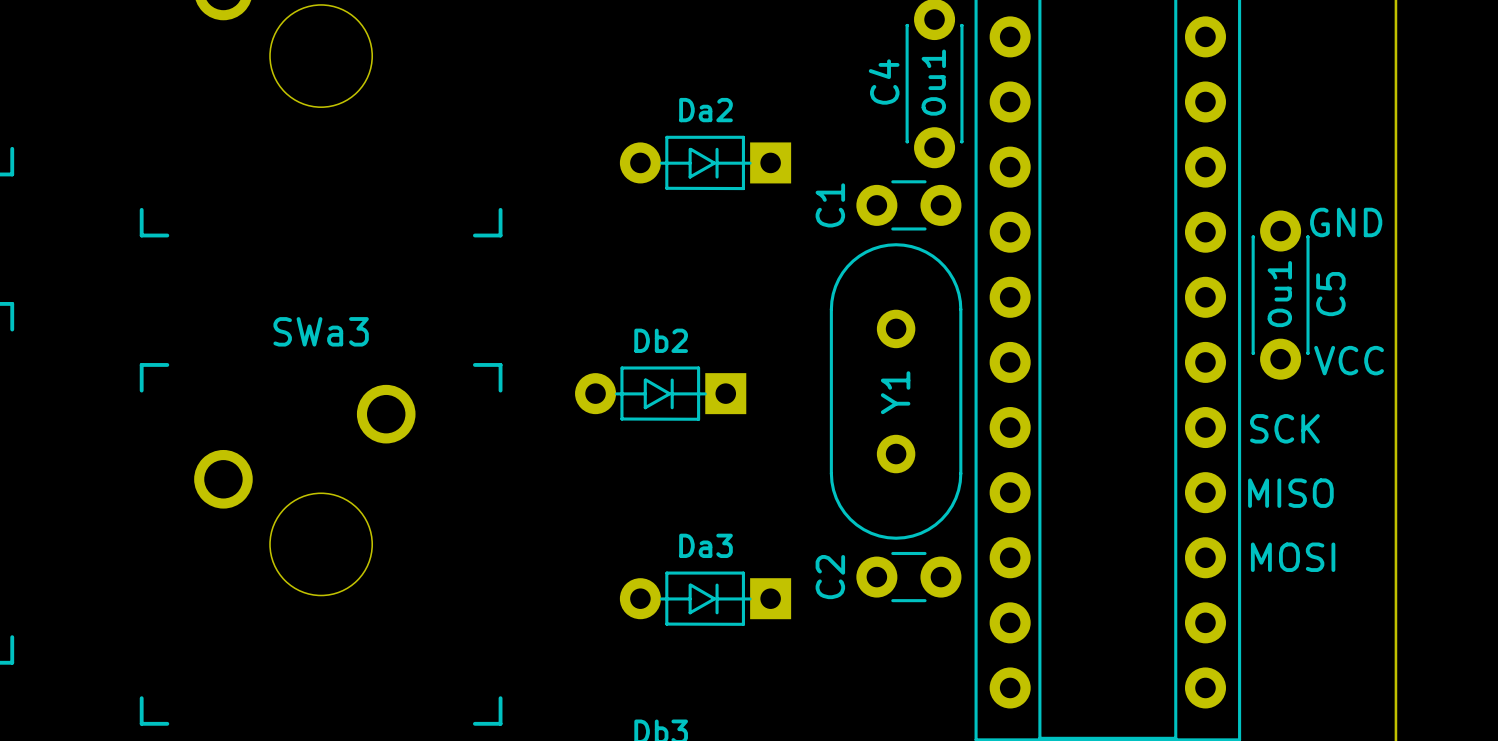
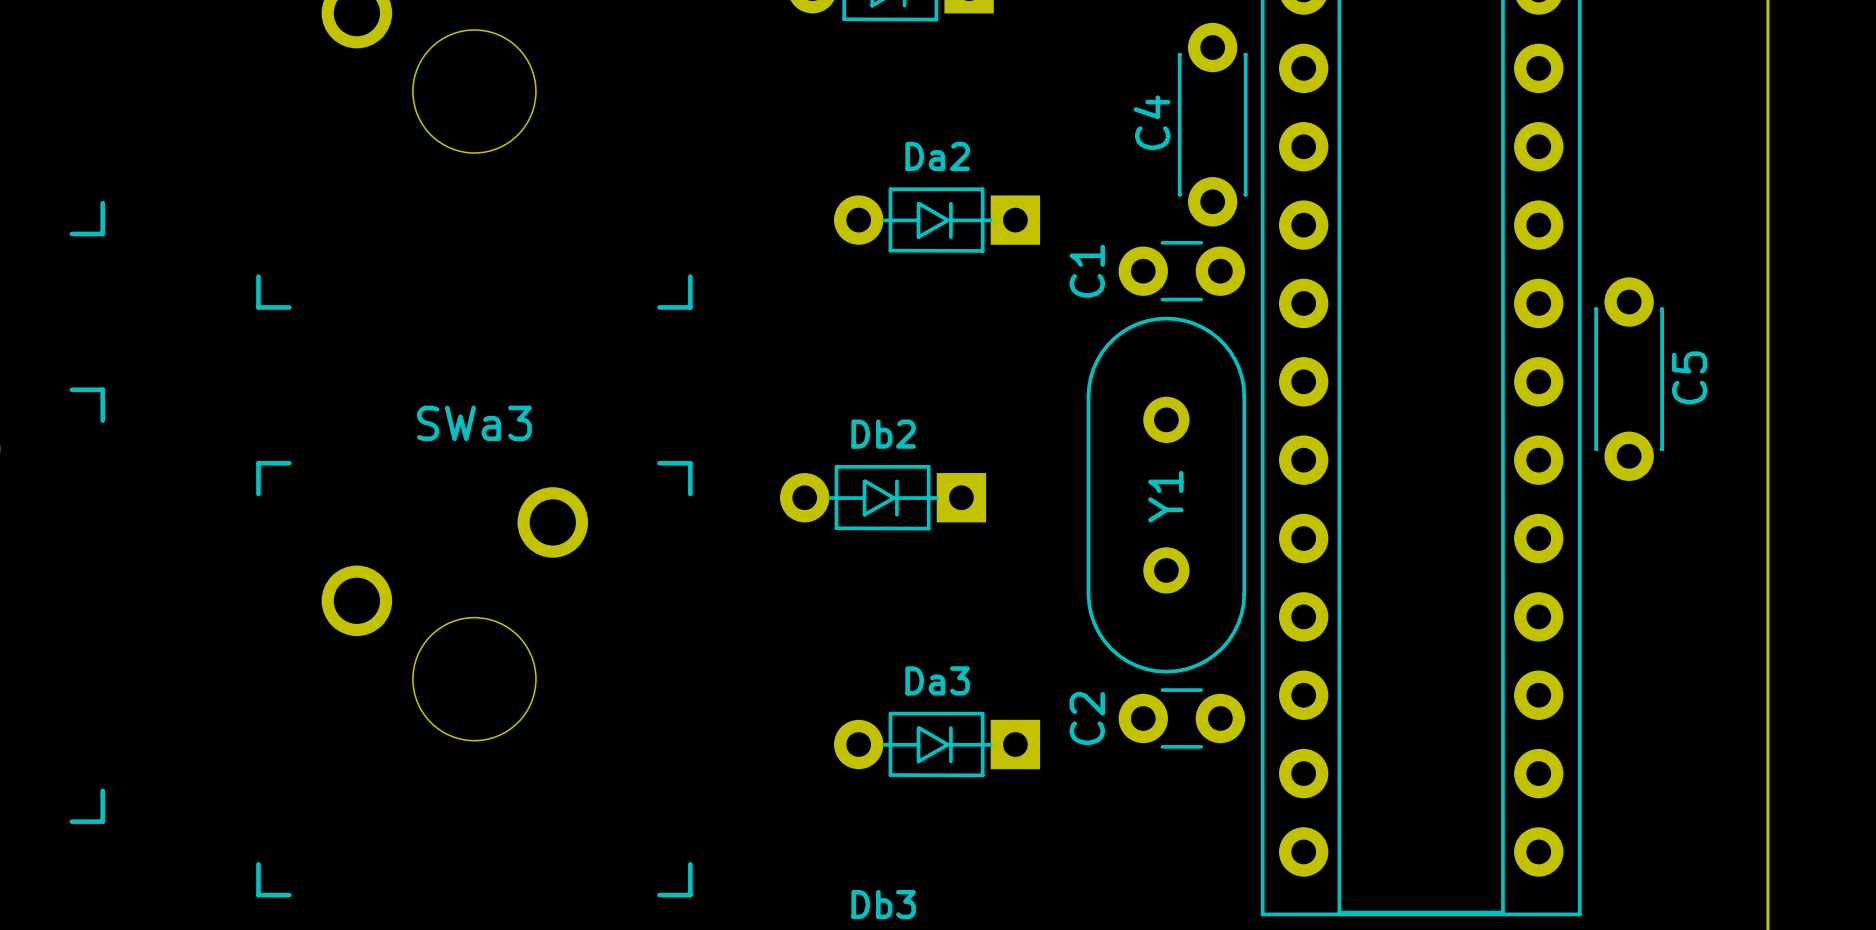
C4 value: 0u1 (933, 82) -> none
text: GND (1346, 222) -> none
C5 value: 0u1 (1279, 294) -> none
text: VCC (1349, 360) -> none
text: SCK (1284, 428) -> none
text: MISO (1290, 493) -> none
text: MOSI (1293, 557) -> none

